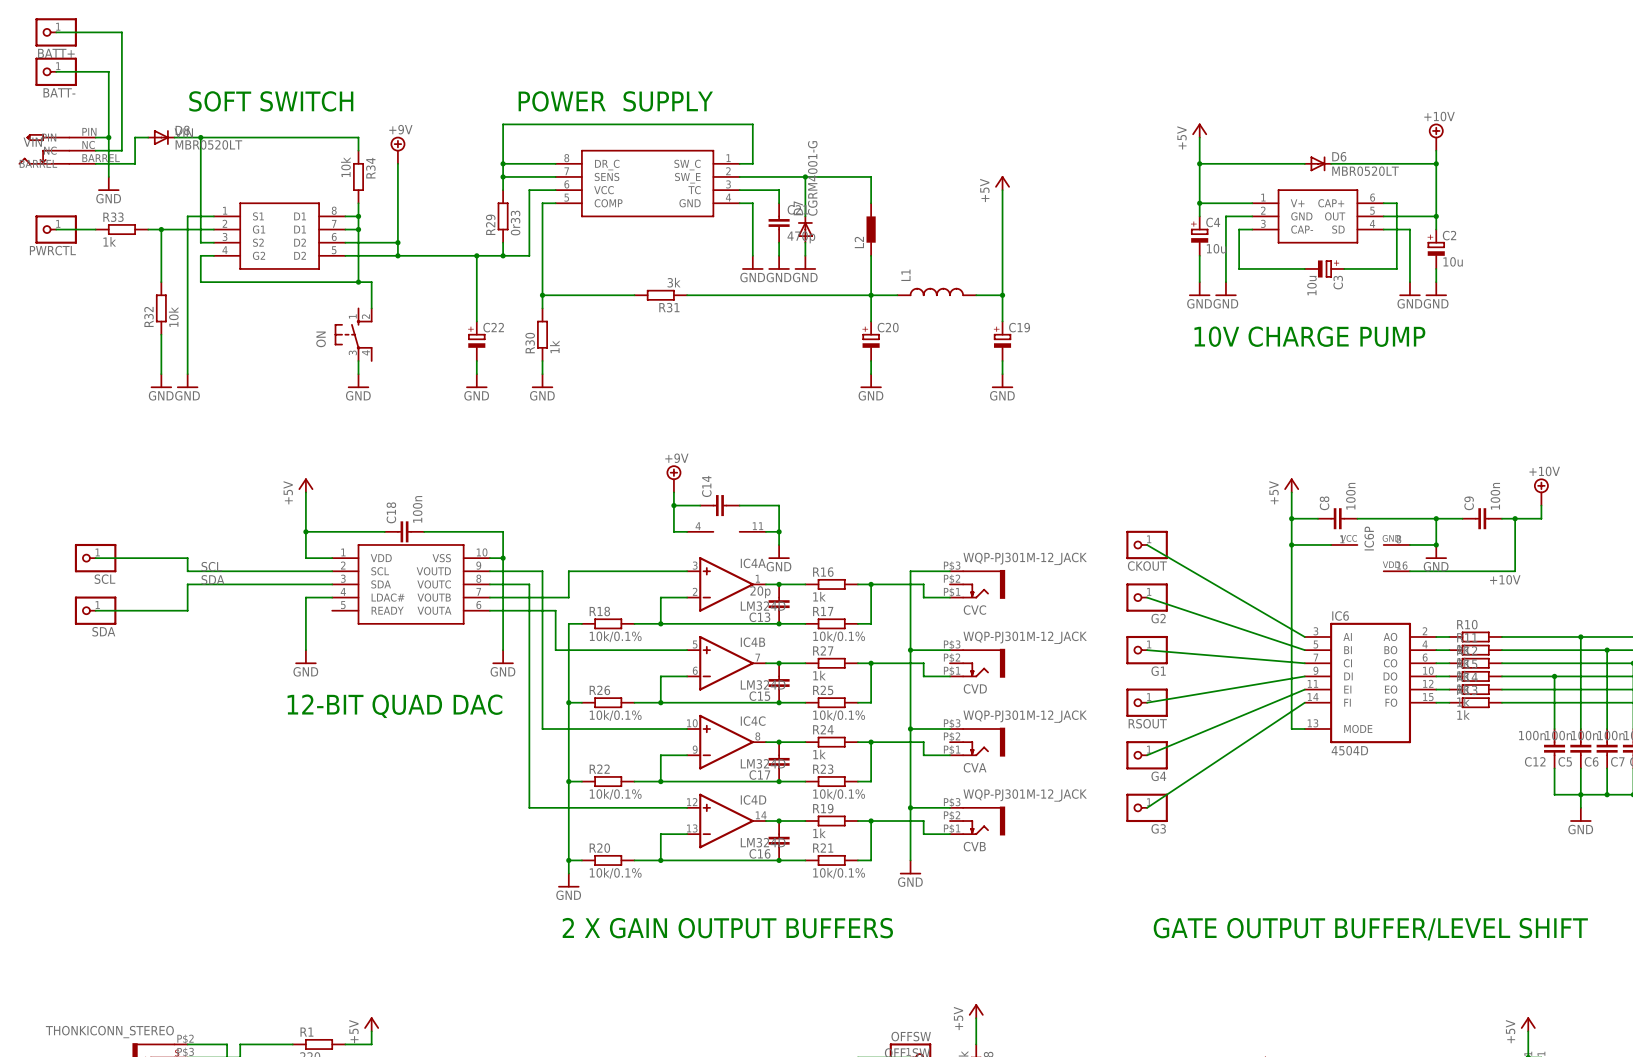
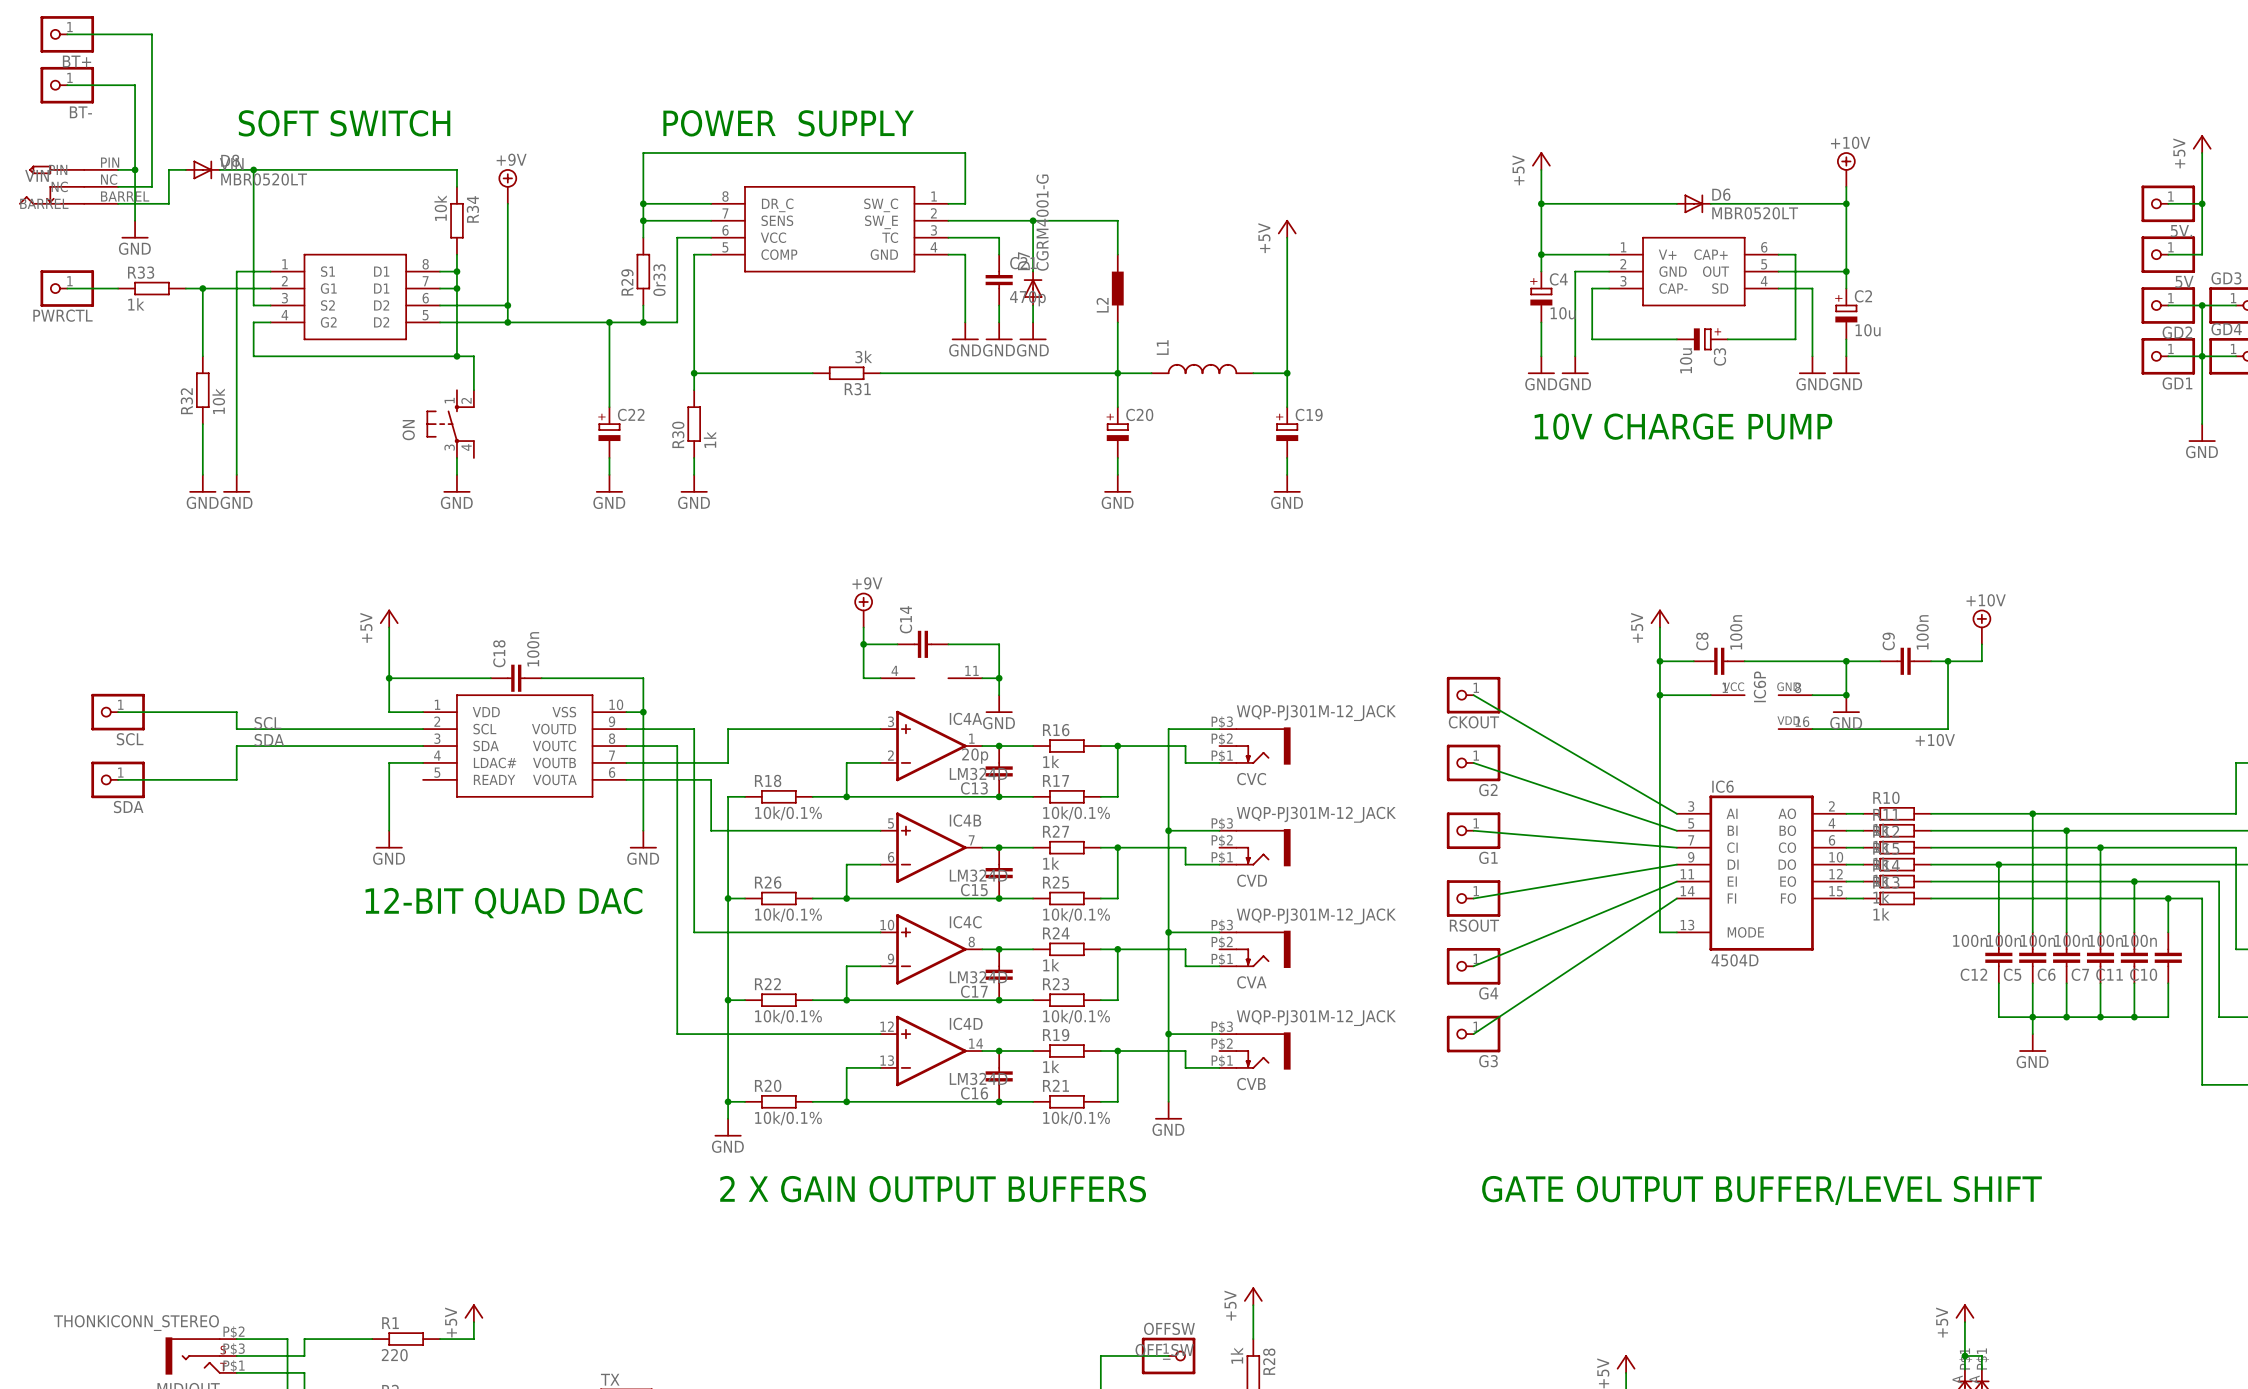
BATT+ name: BATT+ (56, 53) -> BT+ (77, 61)
BATT- name: BATT- (59, 92) -> BT- (80, 112)

